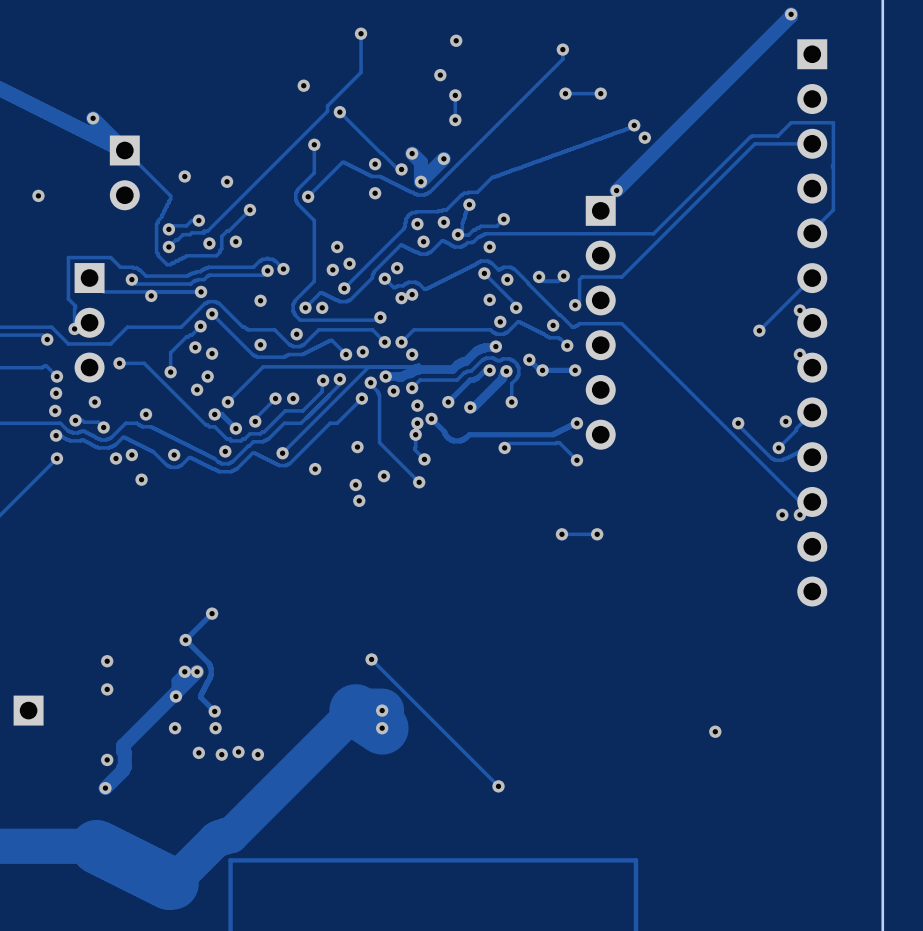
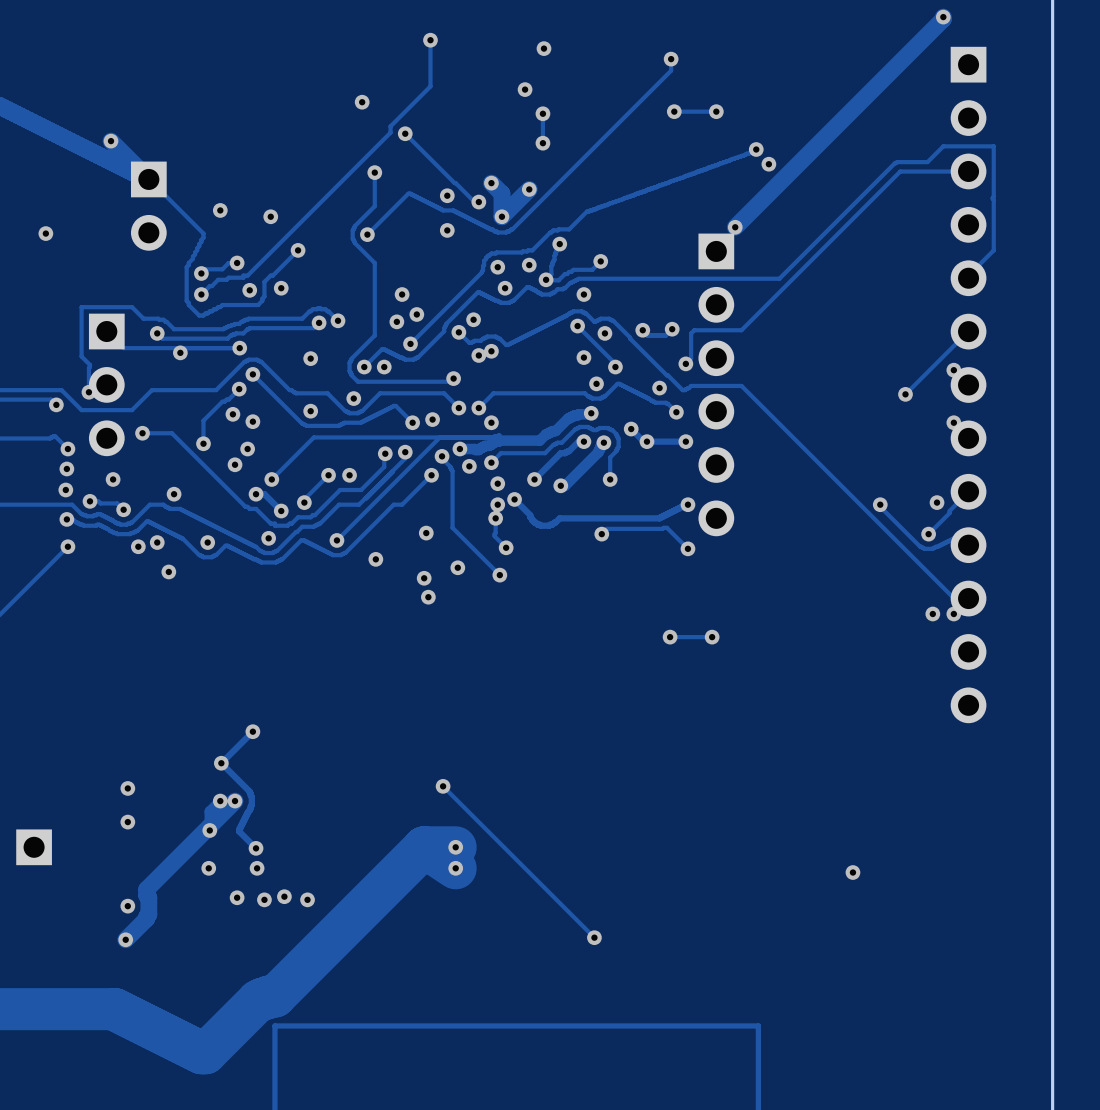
track width: thick (382, 710) (355, 710) (382, 728) -> thin (455, 847) (424, 847) (455, 868)
track width: thick (96, 846) (168, 883) (172, 883) -> thin (115, 1009) (201, 1053) (205, 1053)

